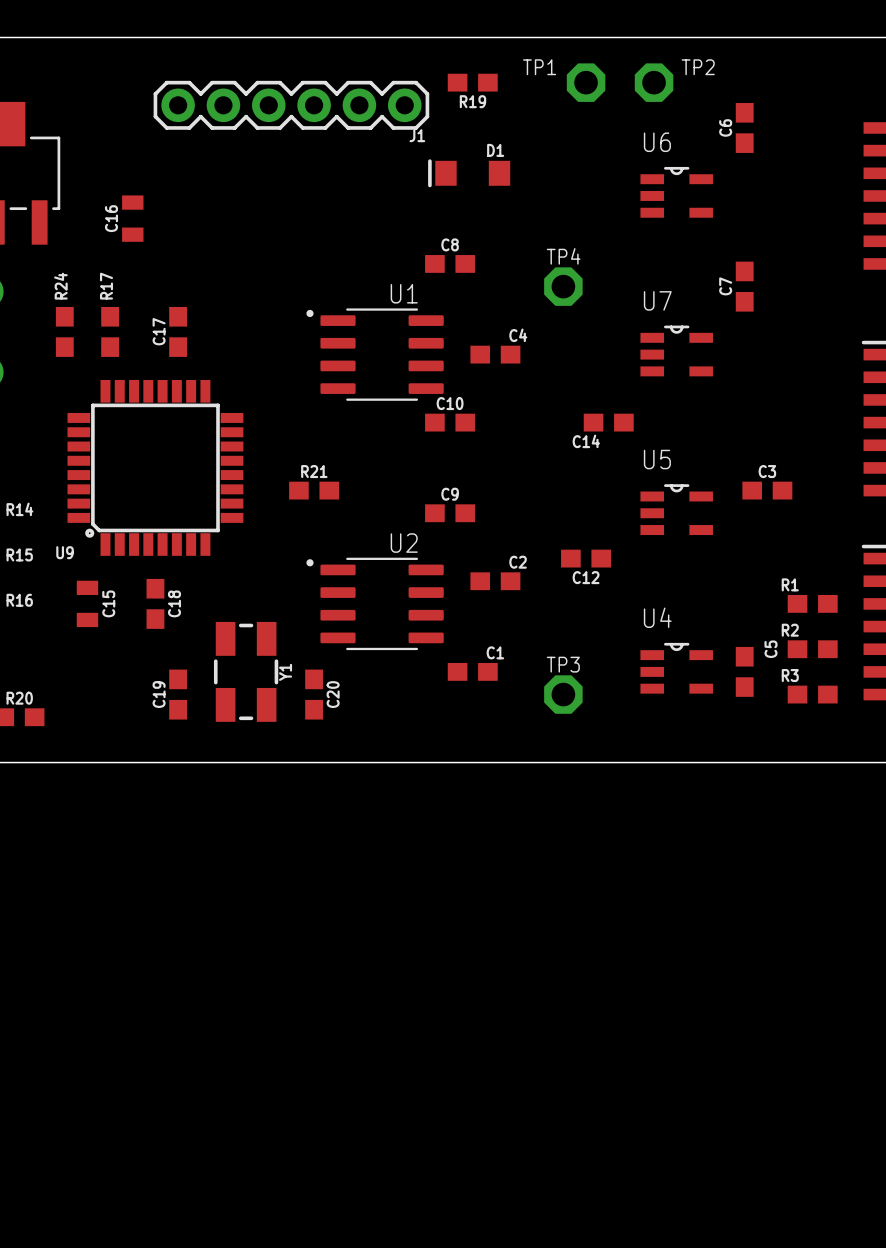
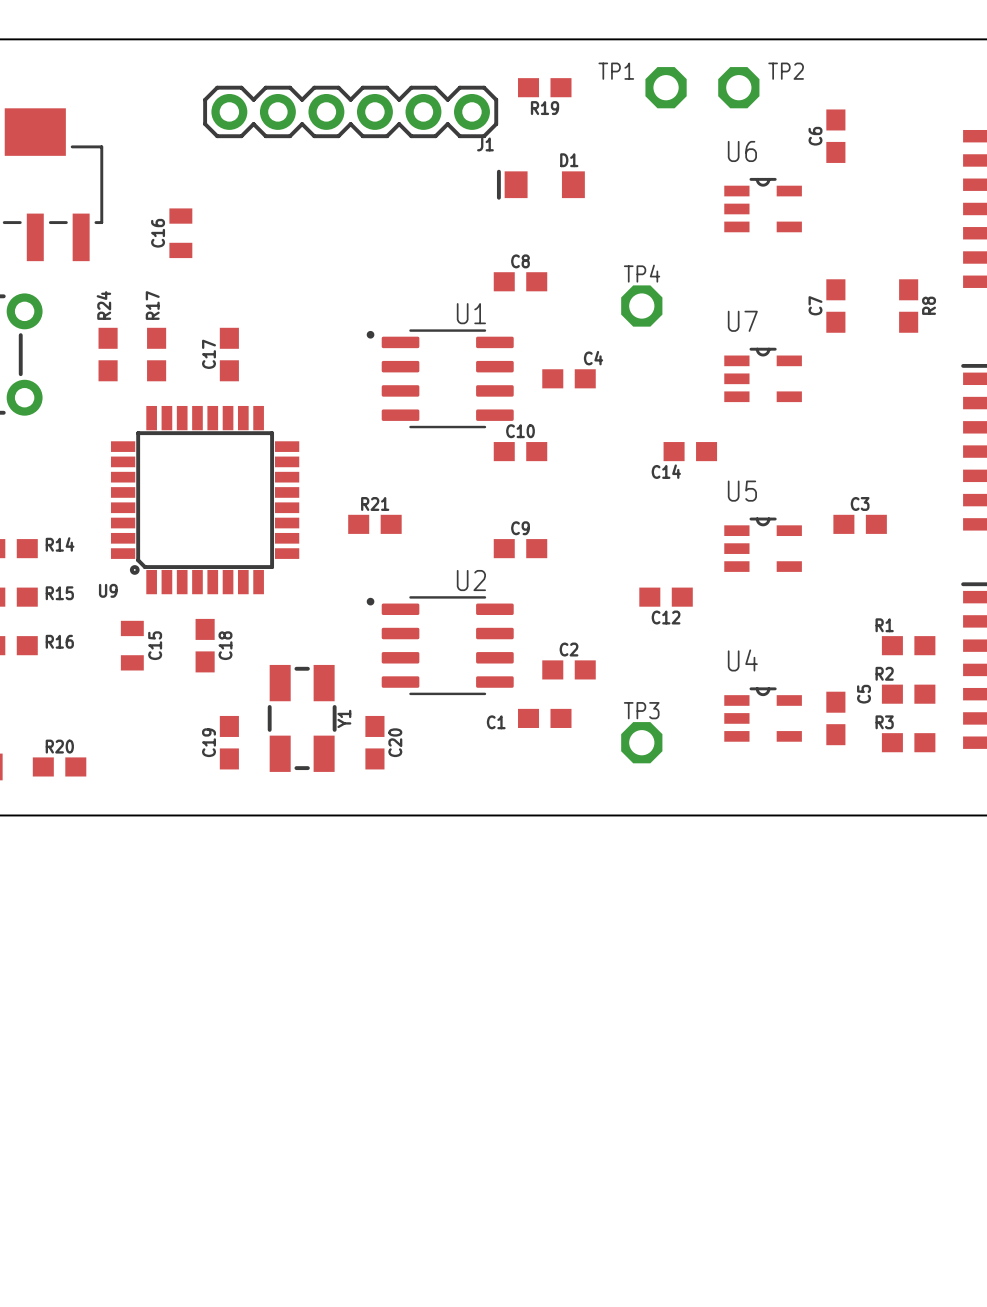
R8: none -> (908, 306)
C2 name position: C2 (518, 562) -> C2 (569, 649)
C2 position: (495, 581) -> (569, 669)
C1 name position: C1 (495, 652) -> C1 (496, 722)

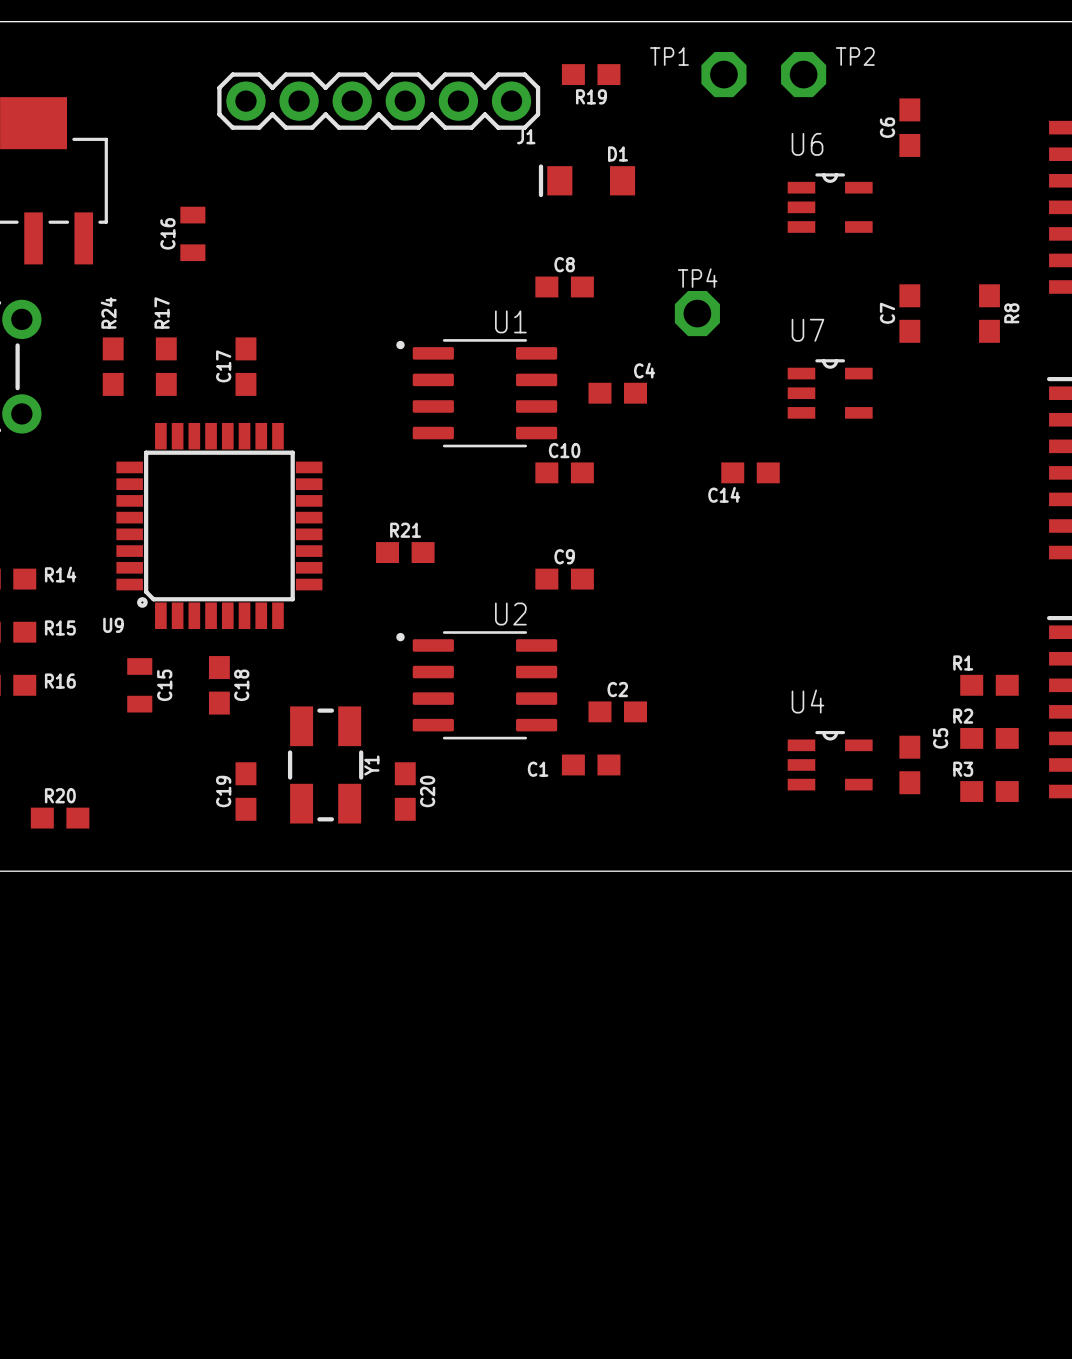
C3: (860, 524) -> none
U5: (763, 544) -> none
C12: (666, 597) -> none
TP3: (641, 742) -> none

